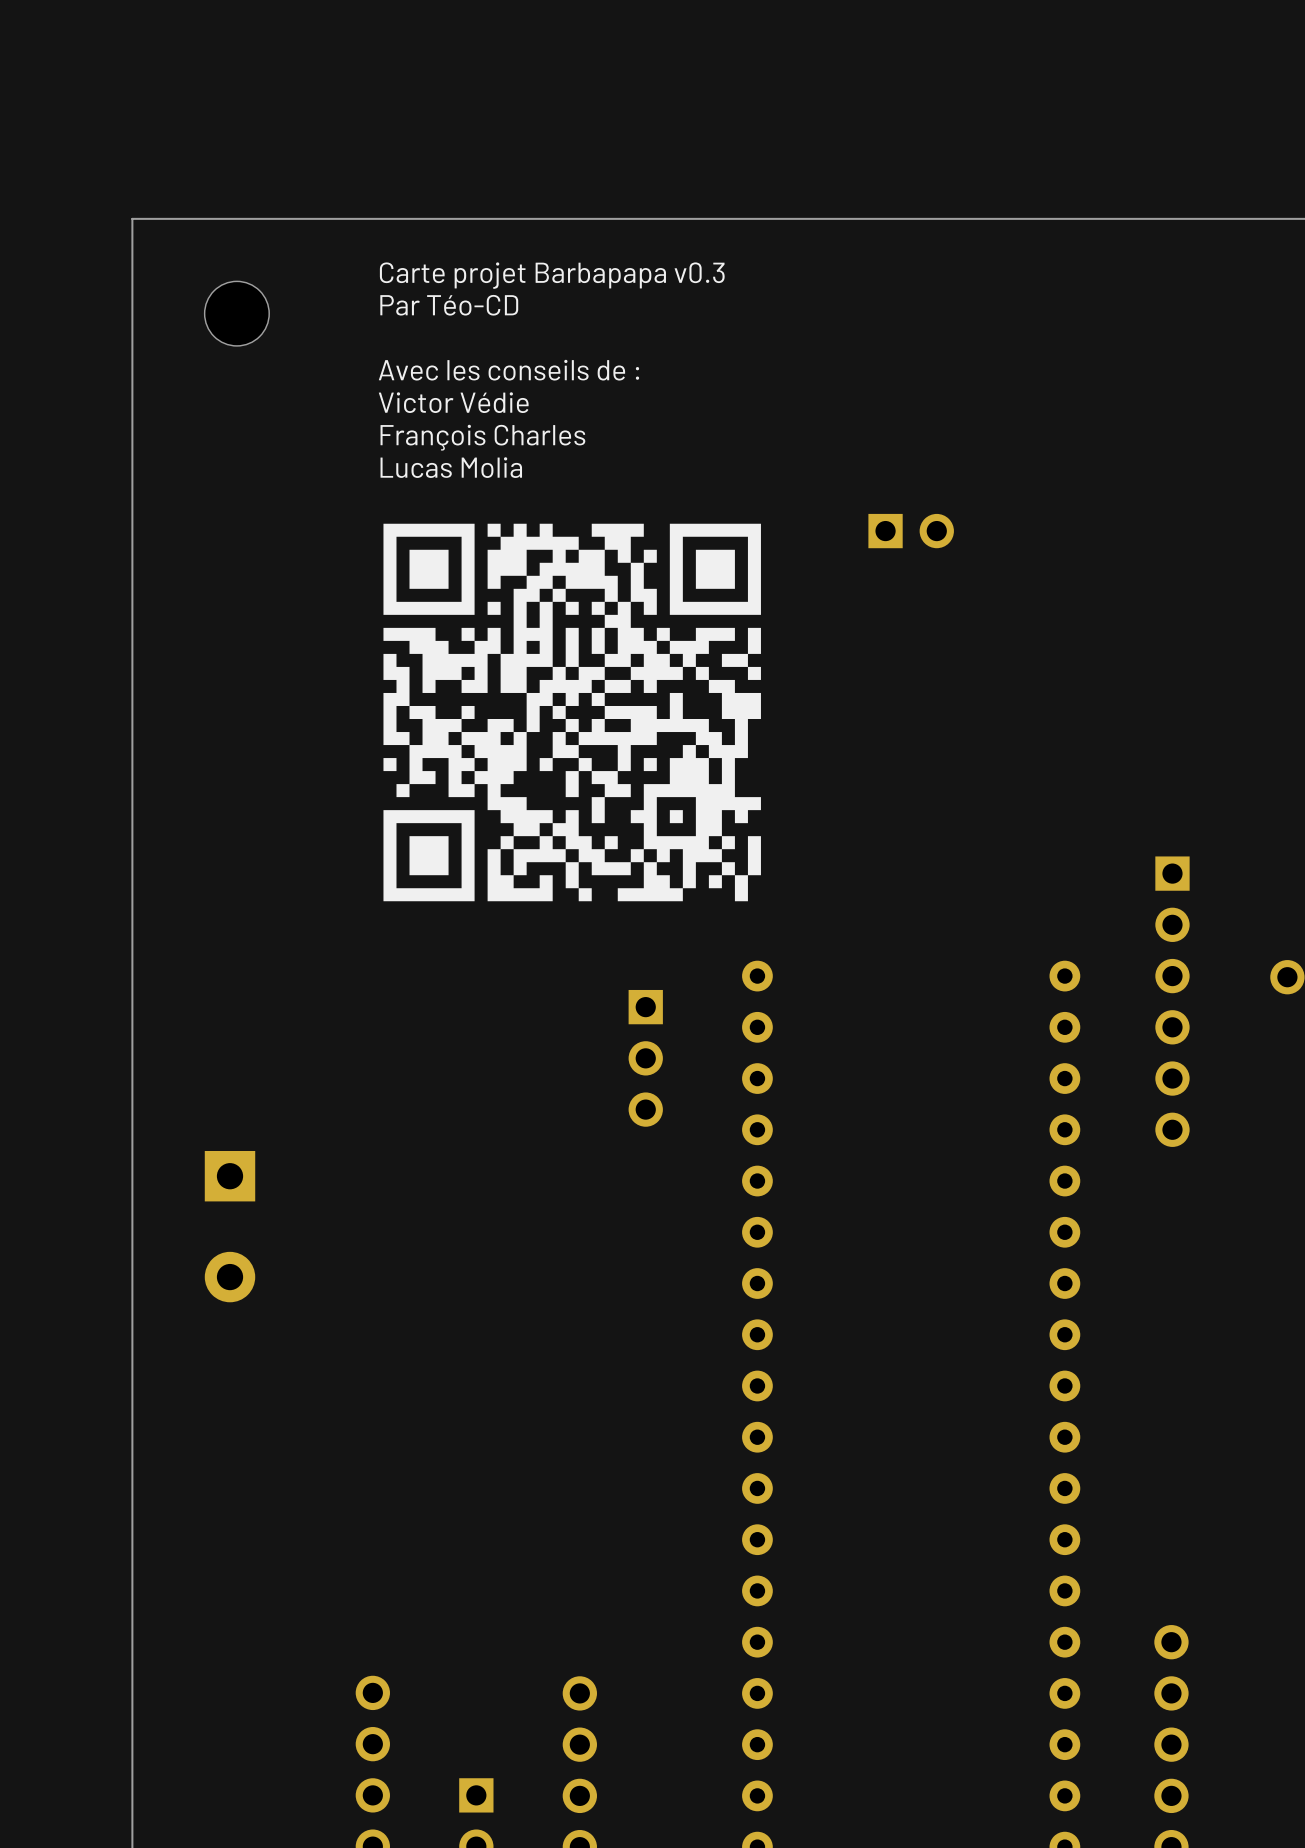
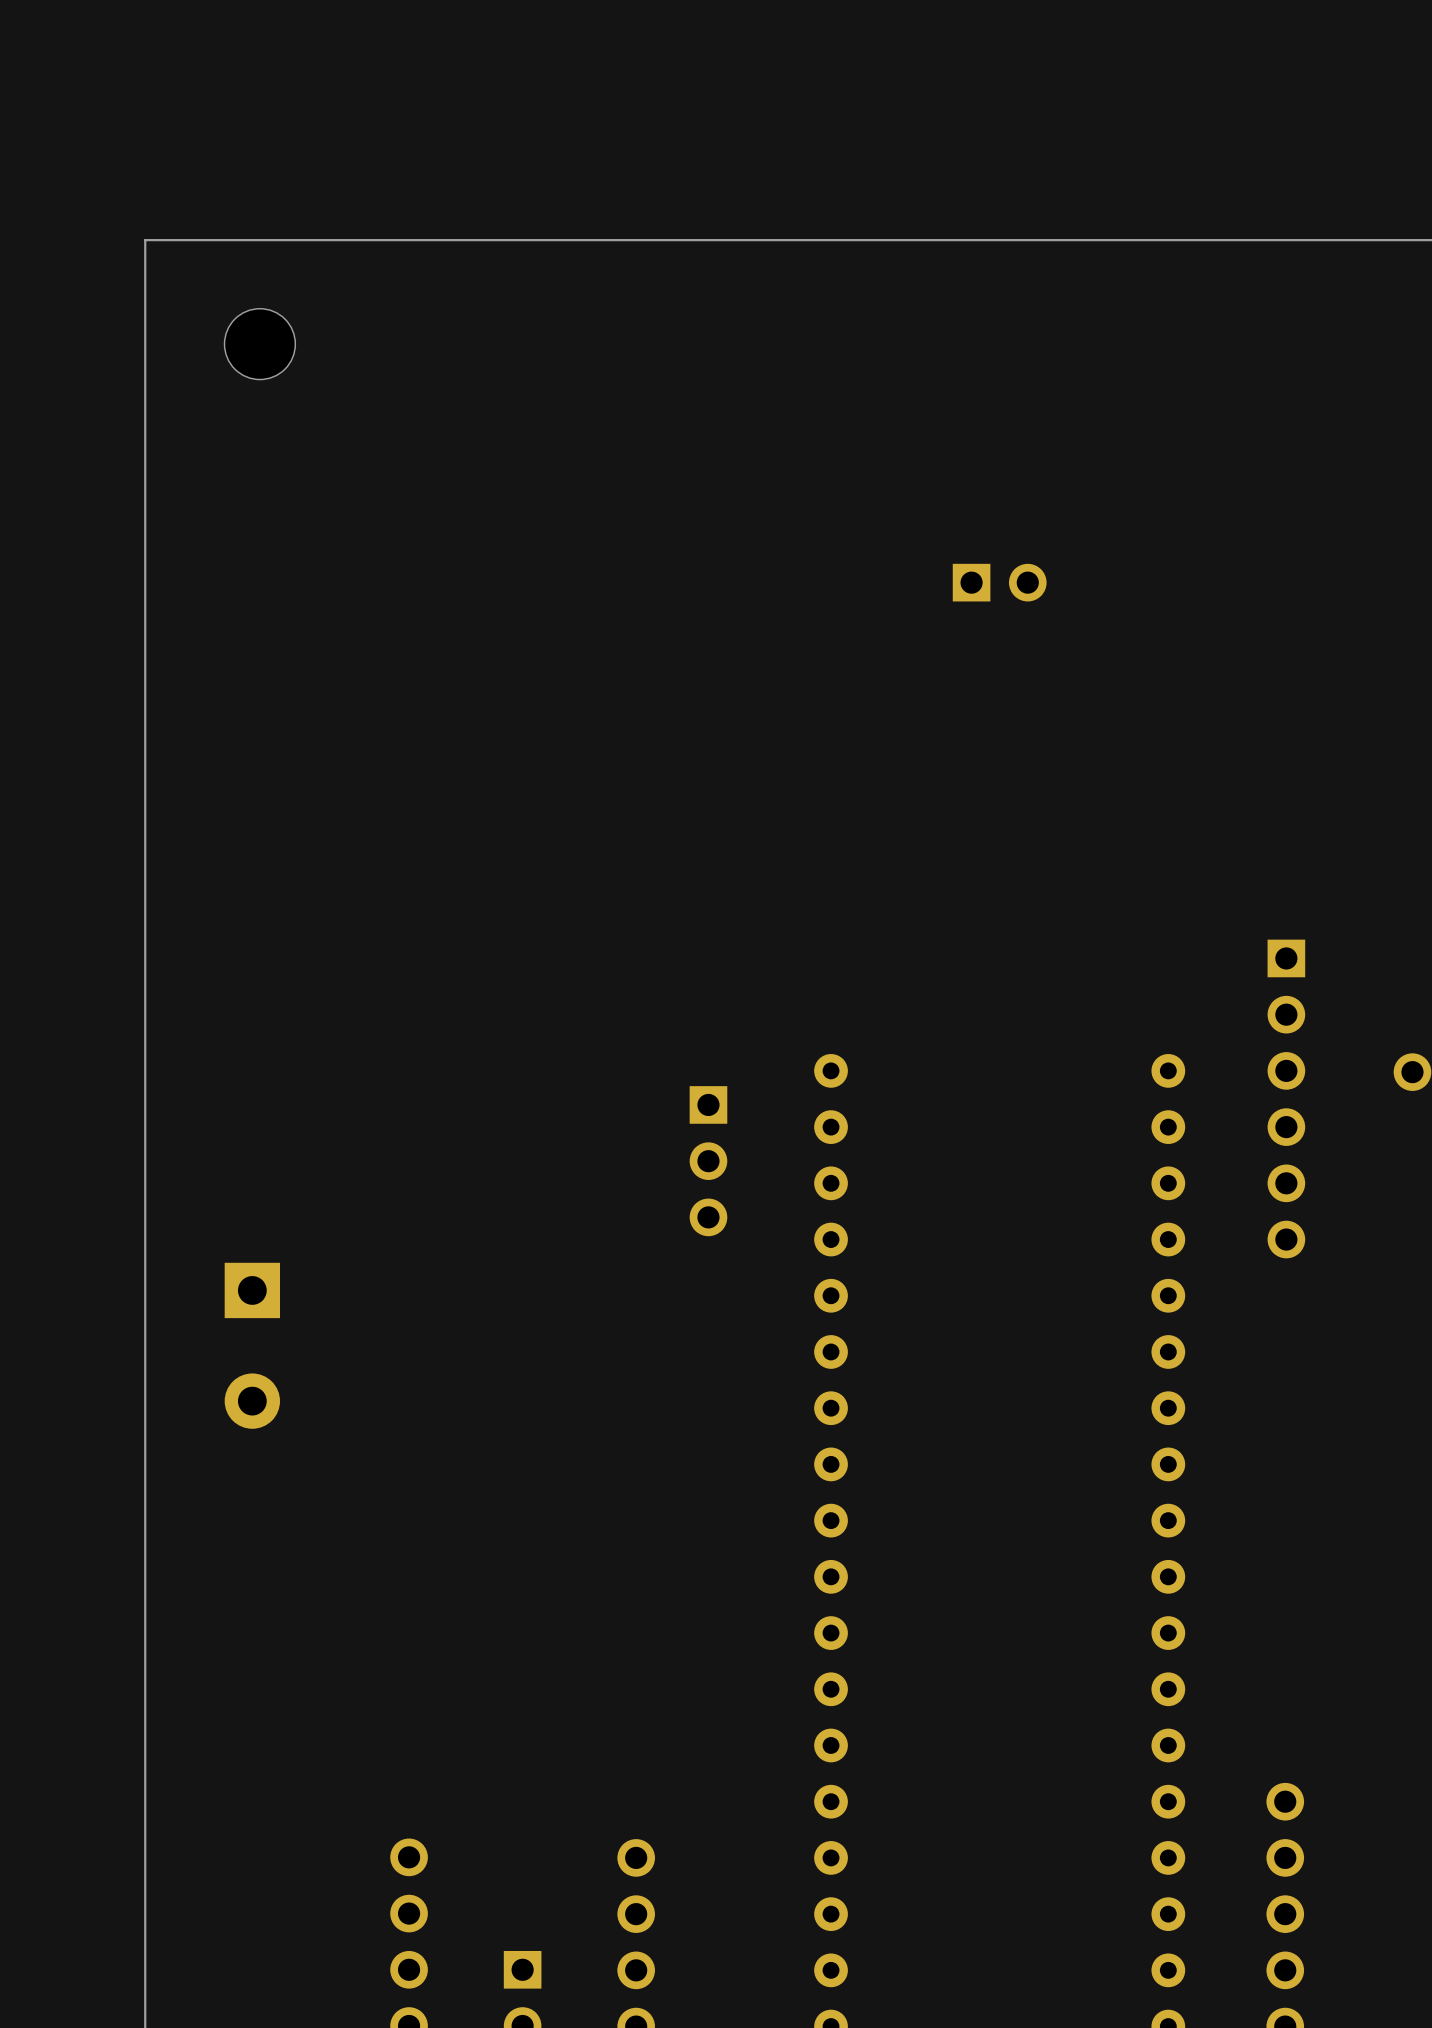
text: Carte projet Barbapapa v0.3 (552, 275) -> none
text: Par Téo-CD (449, 305) -> none
text: Avec les conseils de : (508, 370) -> none
text: Victor Védie (453, 402) -> none
text: François Charles (482, 437) -> none
text: Lucas Molia (451, 467) -> none
drawing: [383, 523, 761, 902] -> none

